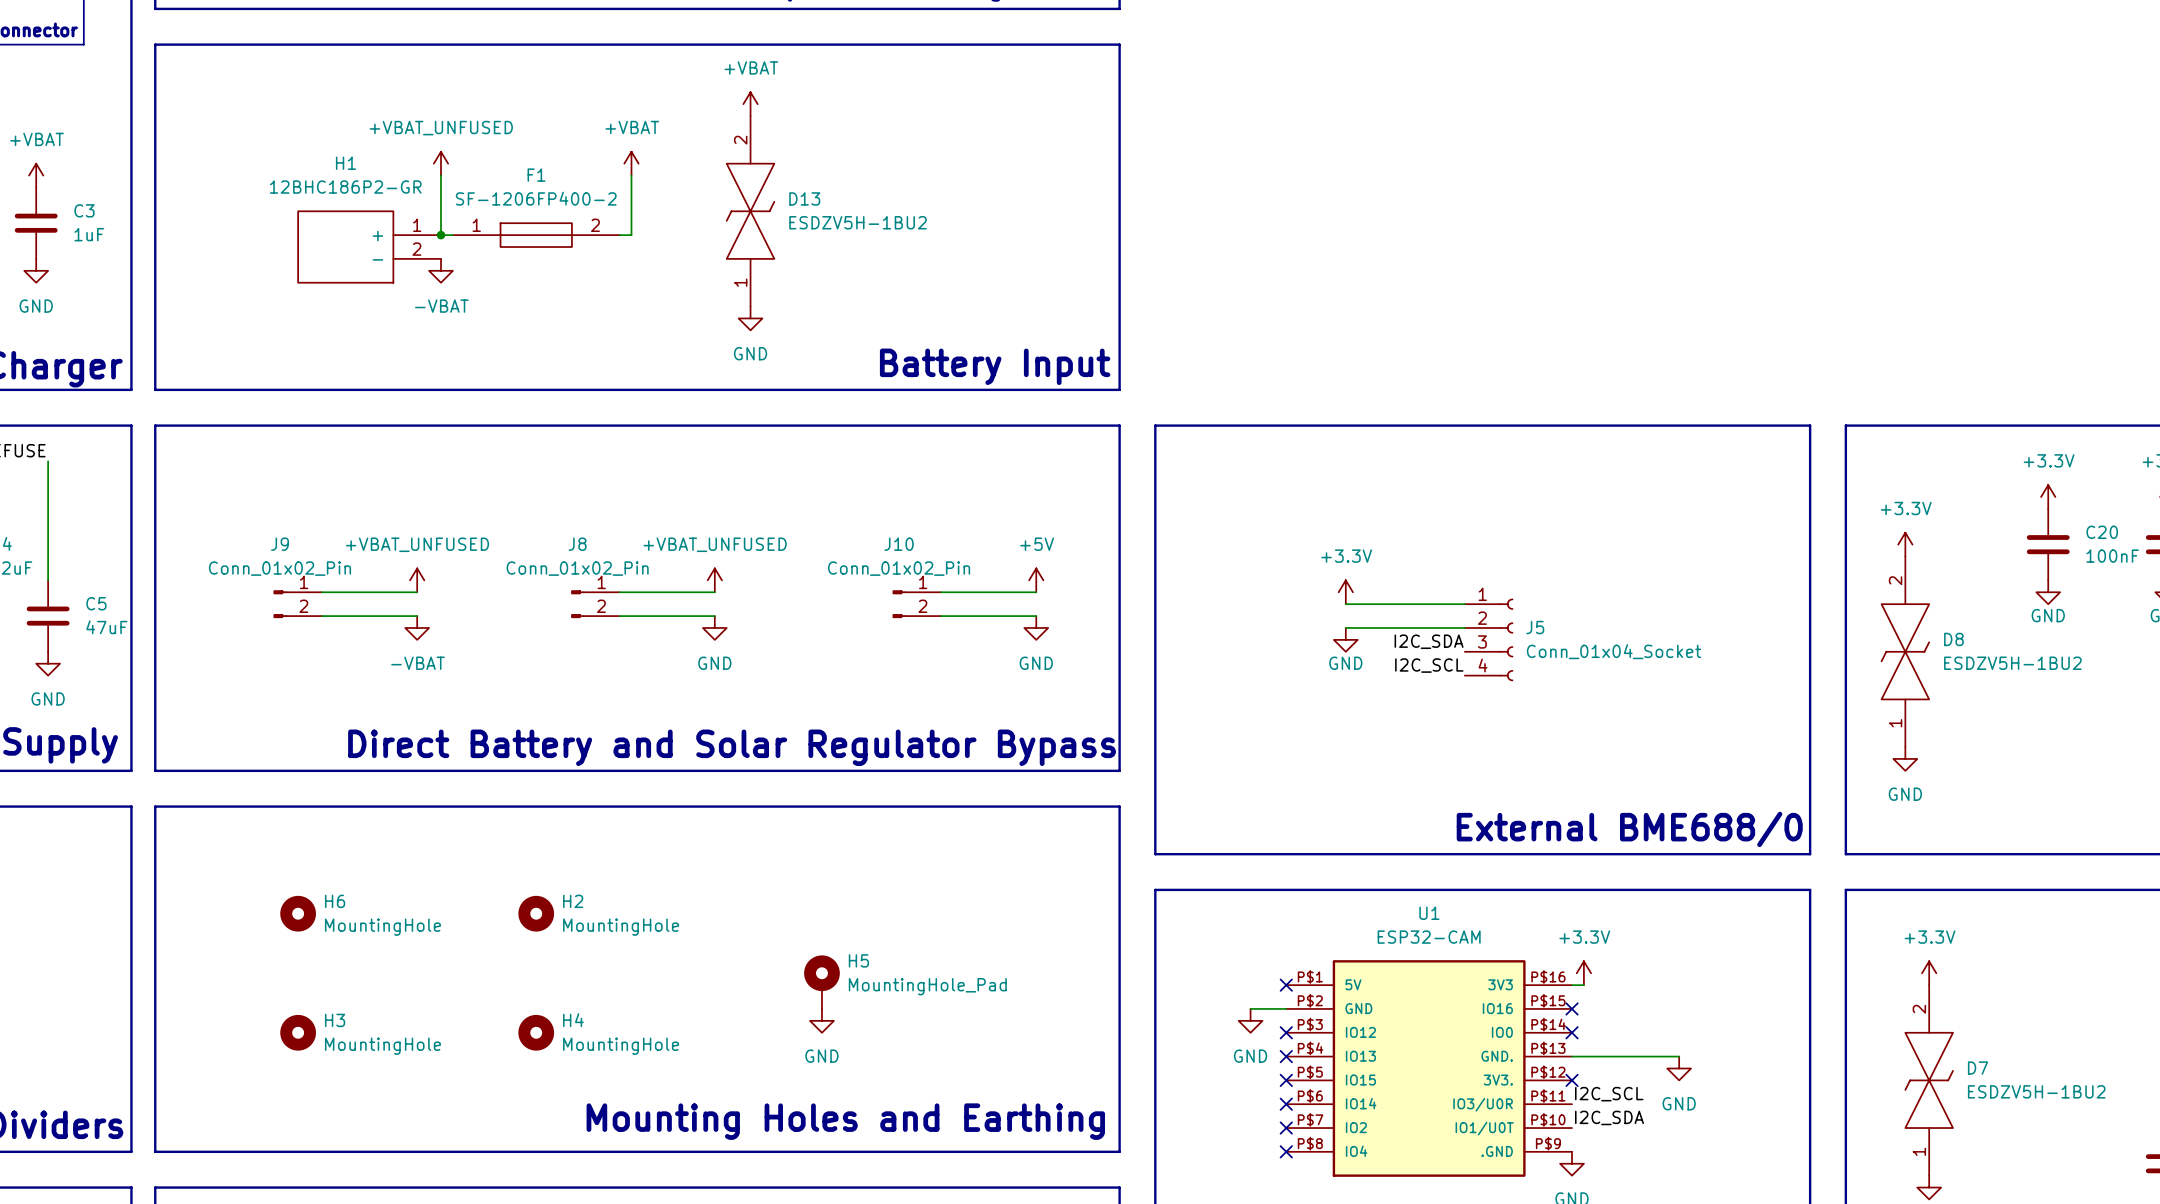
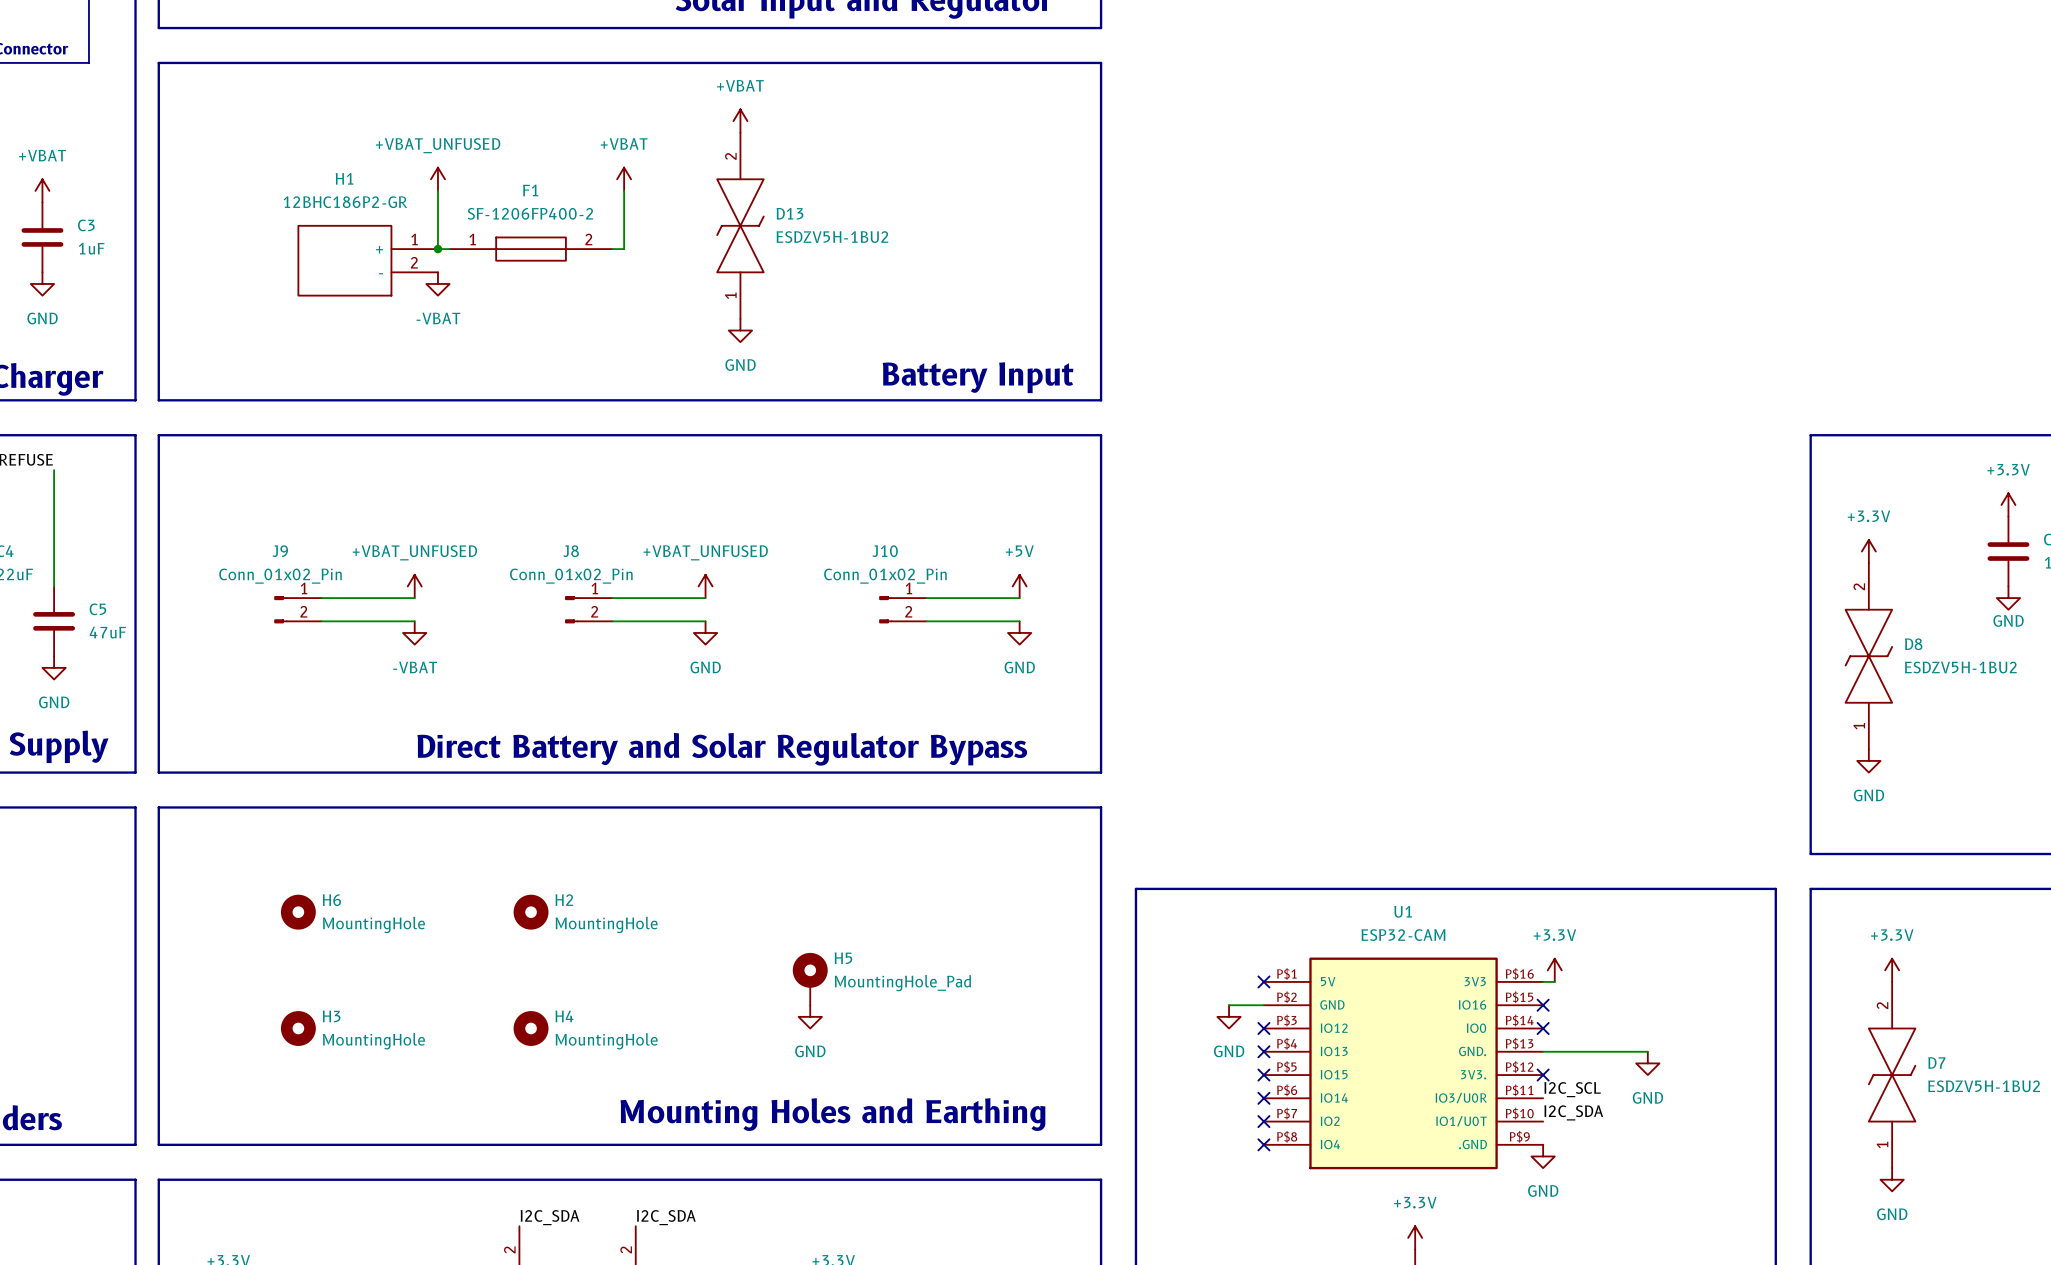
line: (1155, 425) (1810, 425) (1810, 854) (1155, 854) (1155, 425) -> none
power symbol: +3.3V (1345, 592) -> none
wire: (1345, 604) (1464, 604) -> none
wire: (1345, 627) (1464, 627) -> none
power symbol: GND (1345, 639) -> none
J5: Conn_01x04_Socket (1489, 639) -> none
label: I2C_SDA (1429, 641) -> none
label: I2C_SCL (1429, 665) -> none
text: External BME688/0 (1629, 829) -> none

